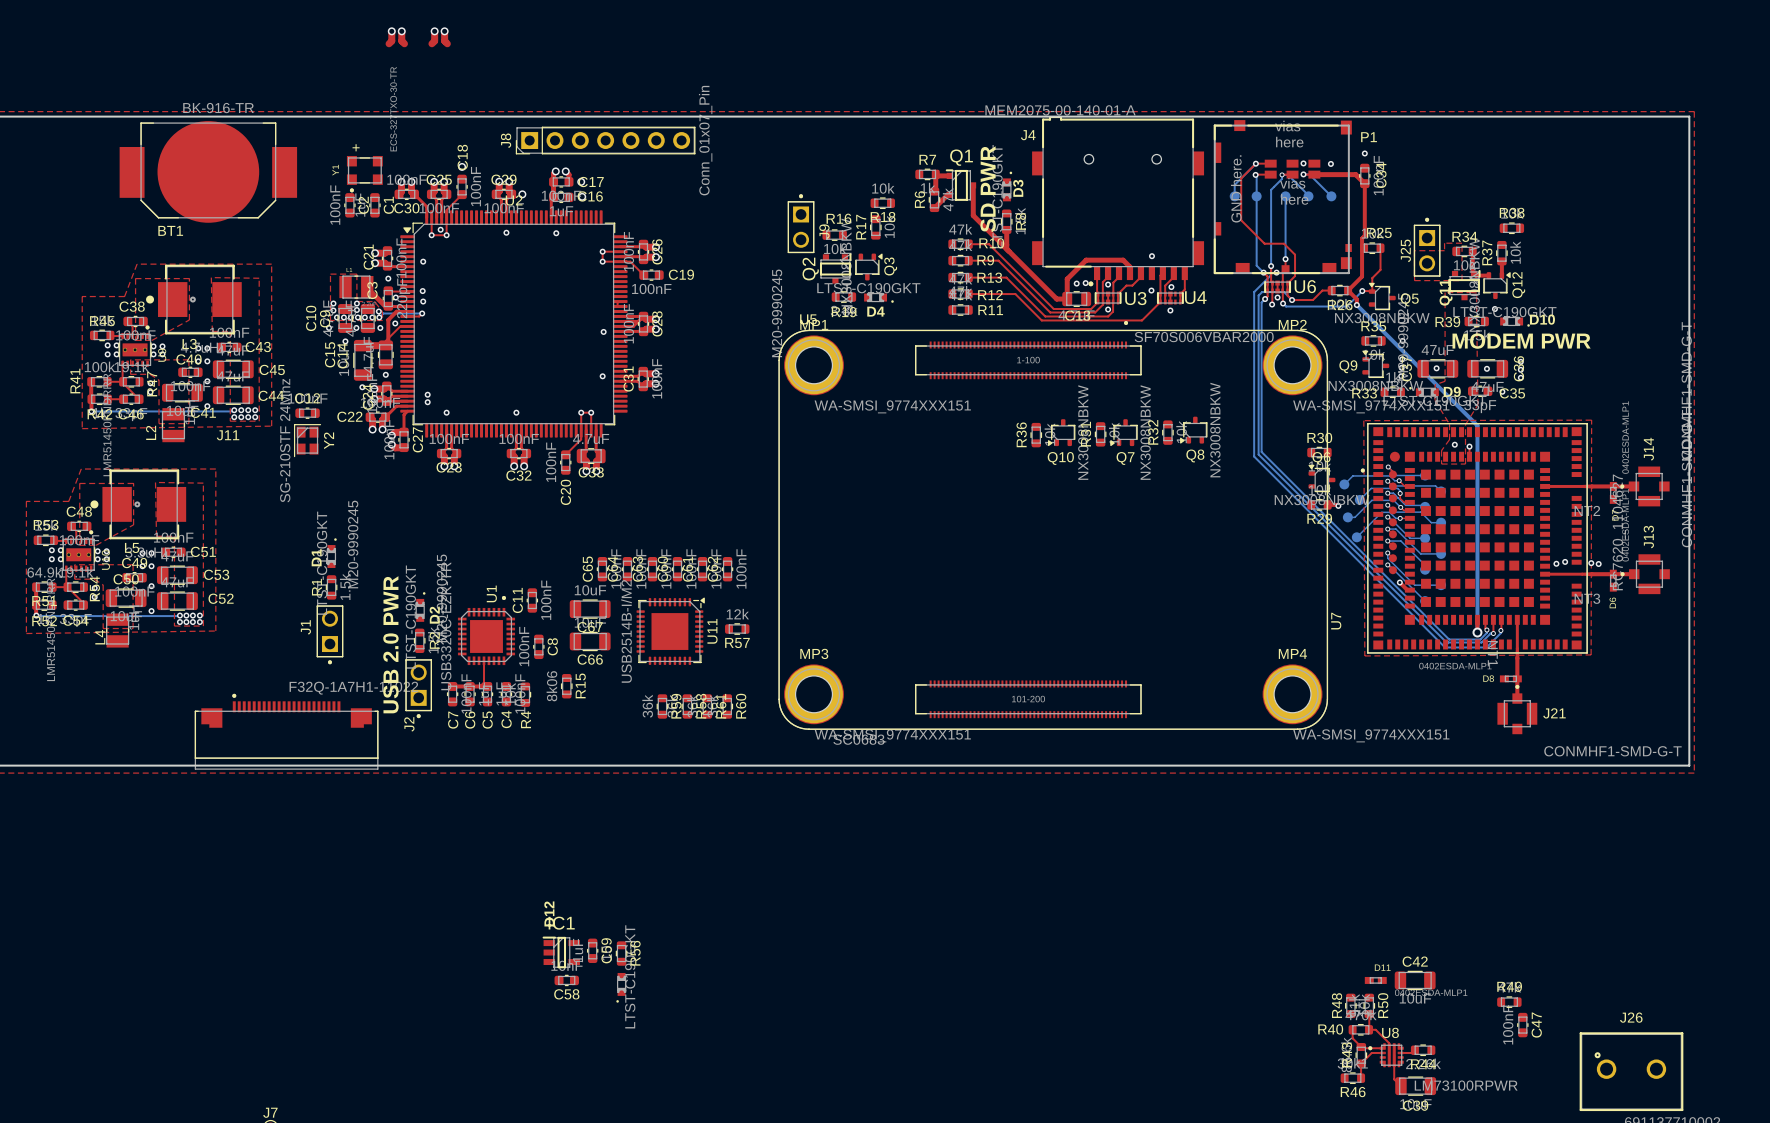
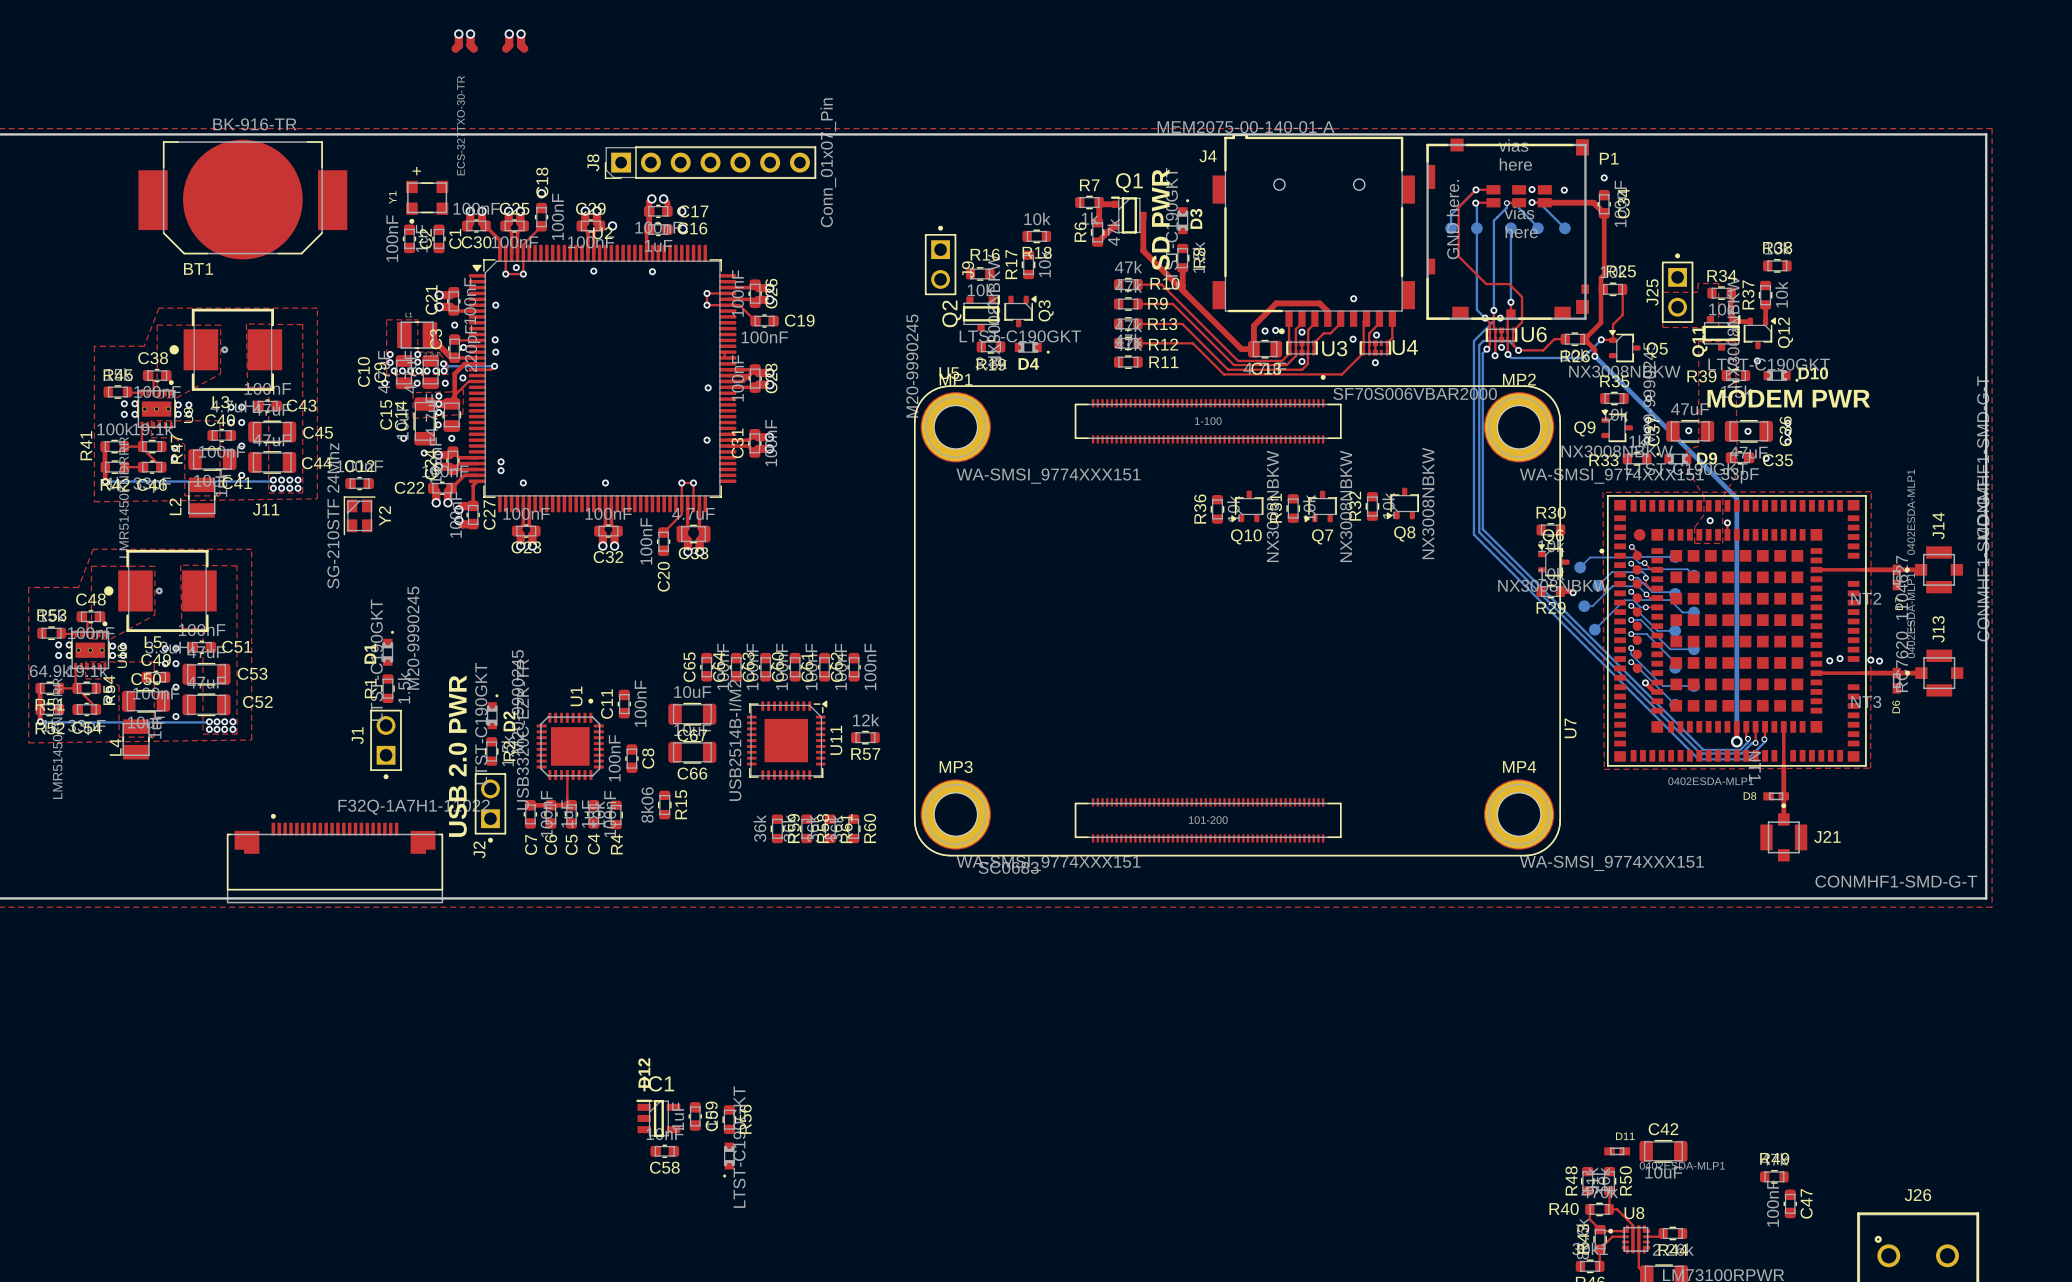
top zone outline: none -> (463, 389) (450, 392) (413, 392) (413, 418) (462, 414) (463, 389)
via: none -> (438, 396)
via: (345, 341) -> none
via: none -> (438, 404)
via: none -> (438, 412)
via: none -> (438, 424)
via: none -> (403, 438)

